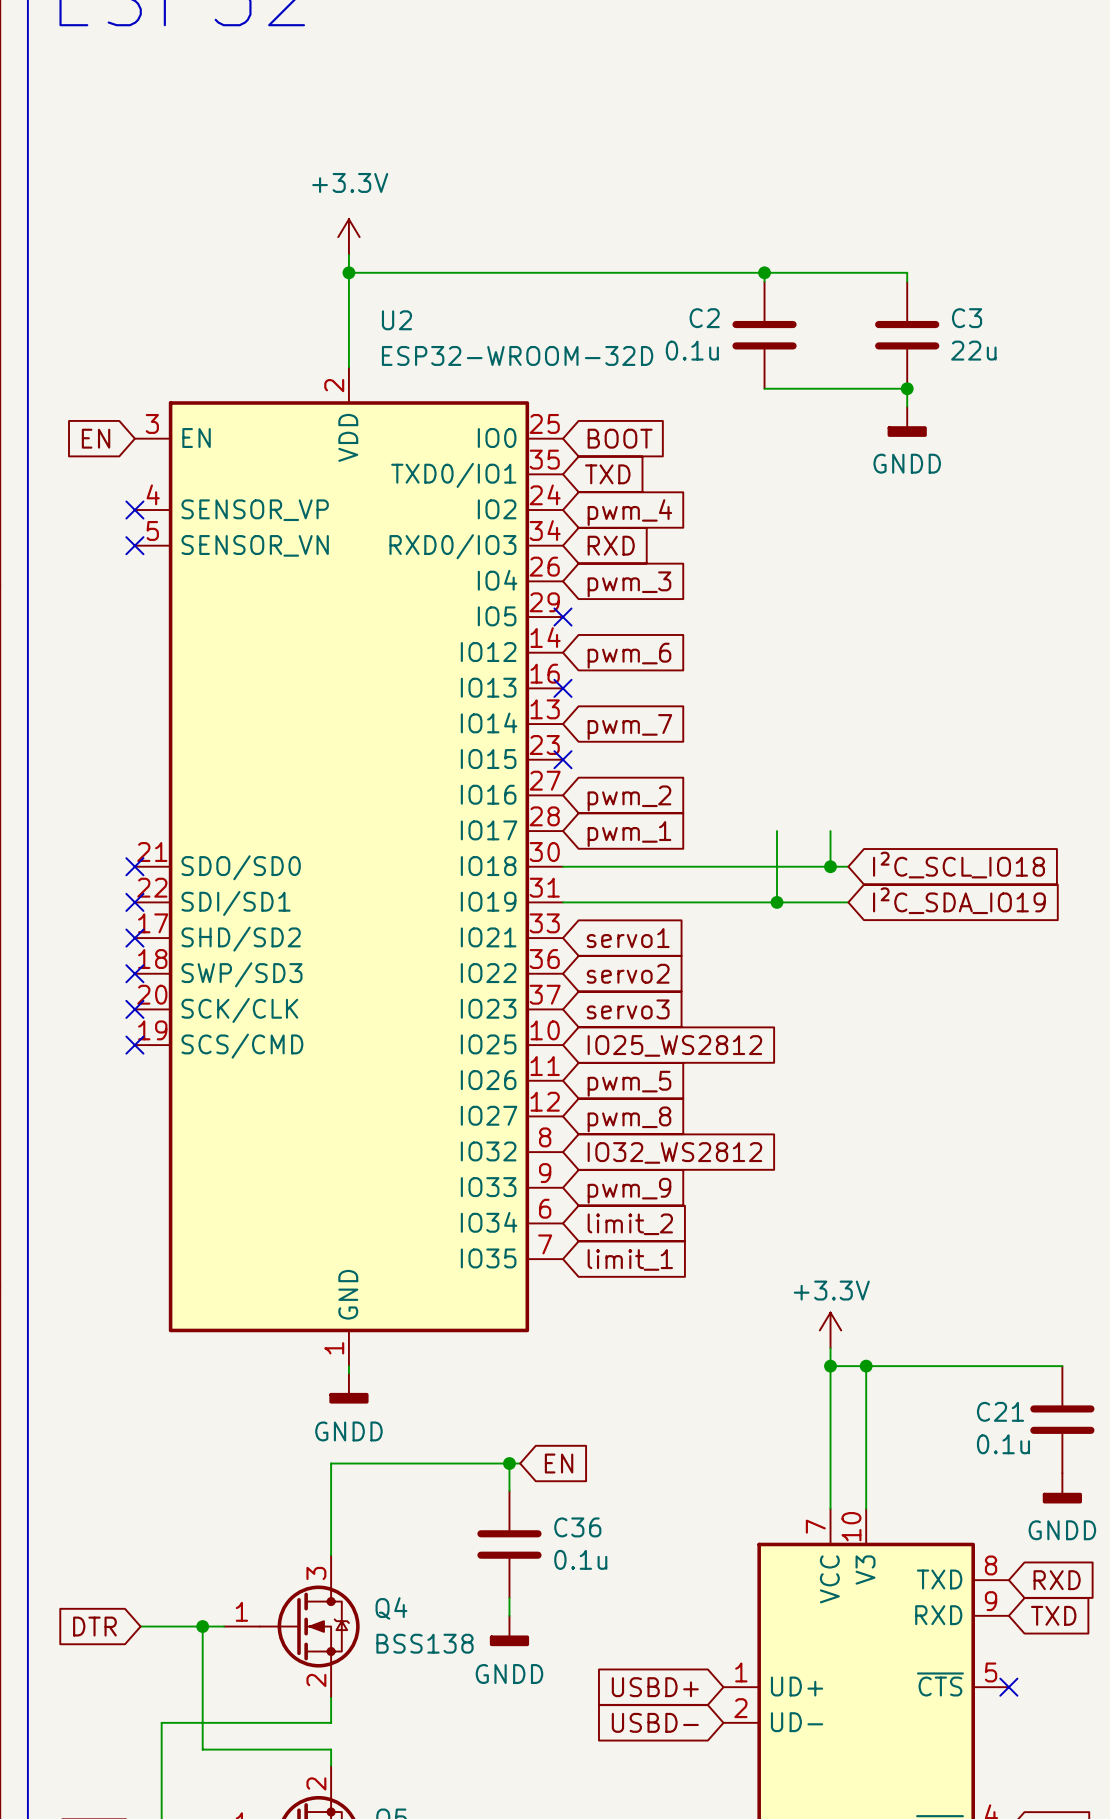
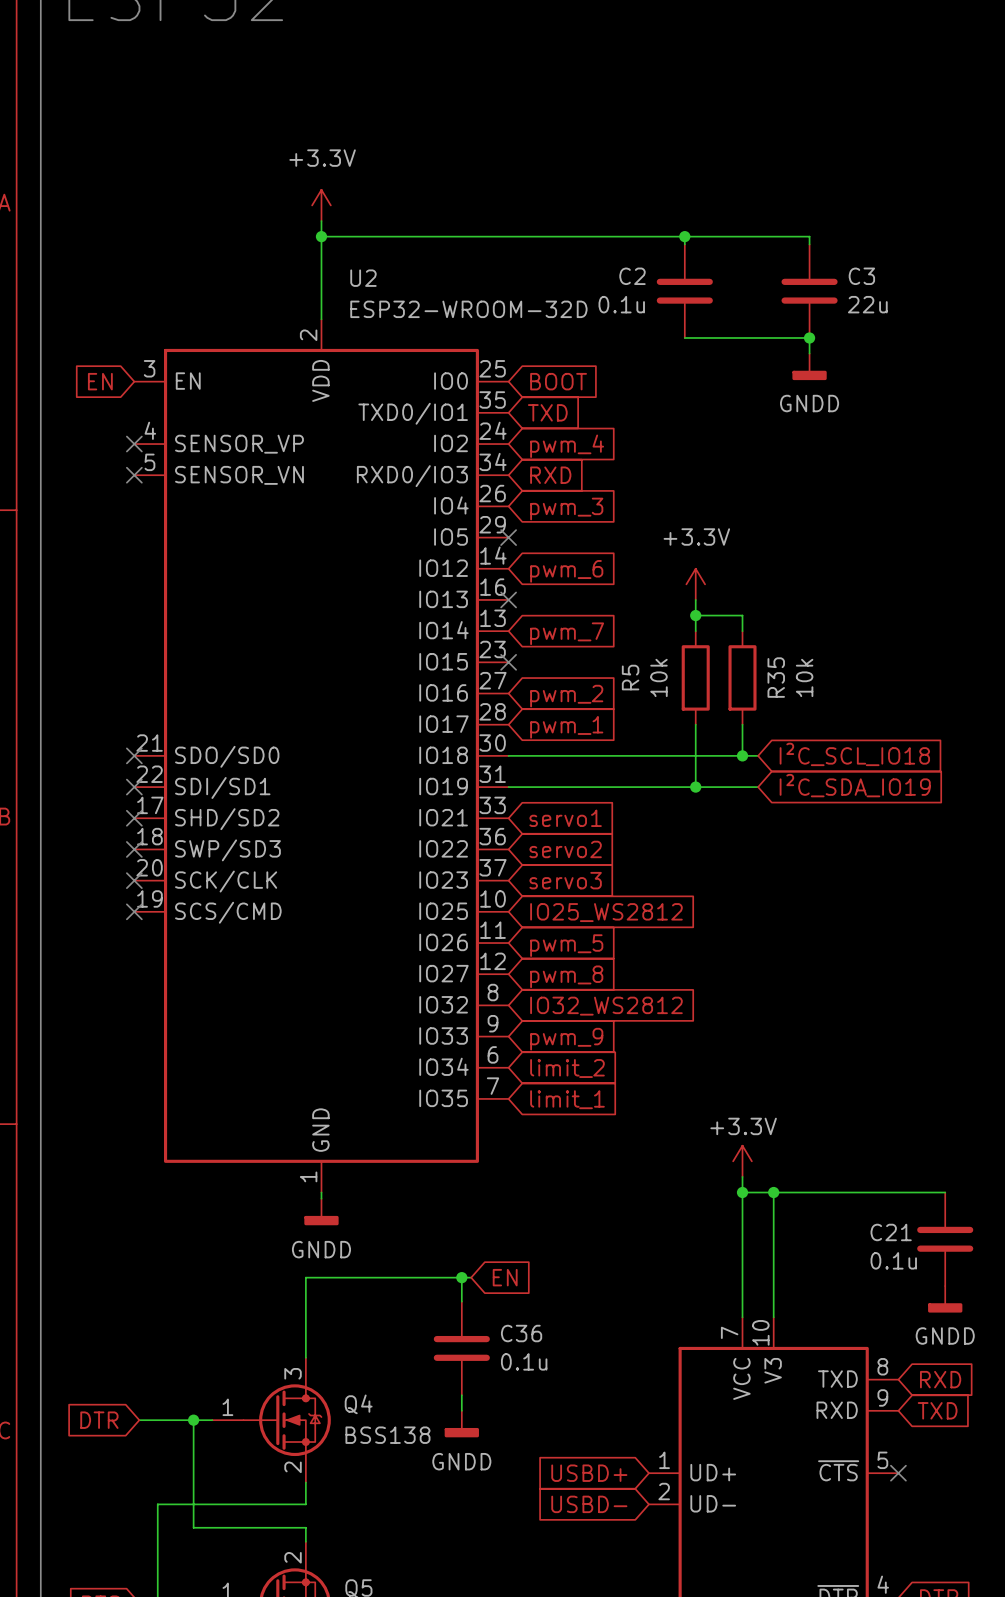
power symbol: none -> +3.3V (695, 584)
wire: none -> (695, 599) (695, 631)
wire: none -> (695, 615) (742, 615) (742, 631)
junction: none -> (695, 615)
R5: none -> 10k (695, 677)
R35: none -> 10k (742, 677)

